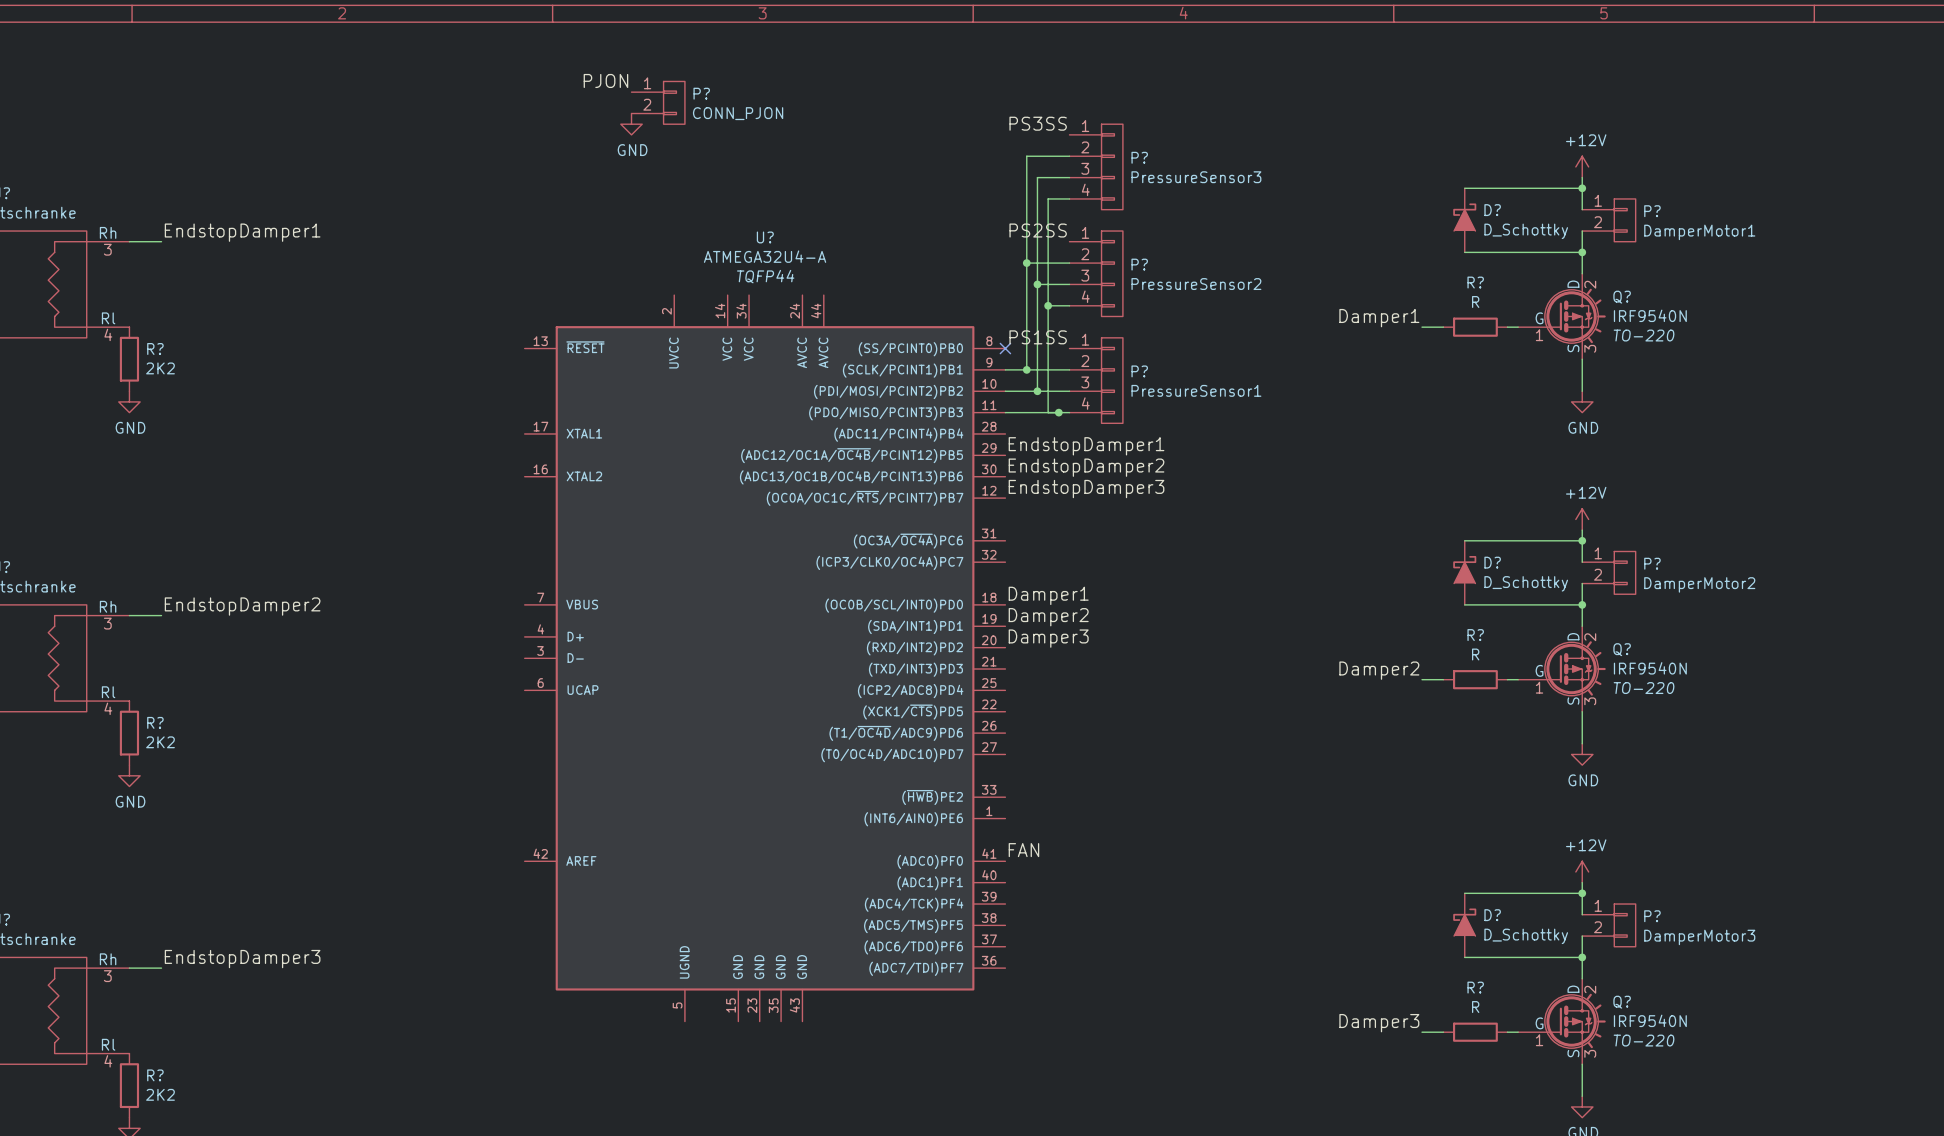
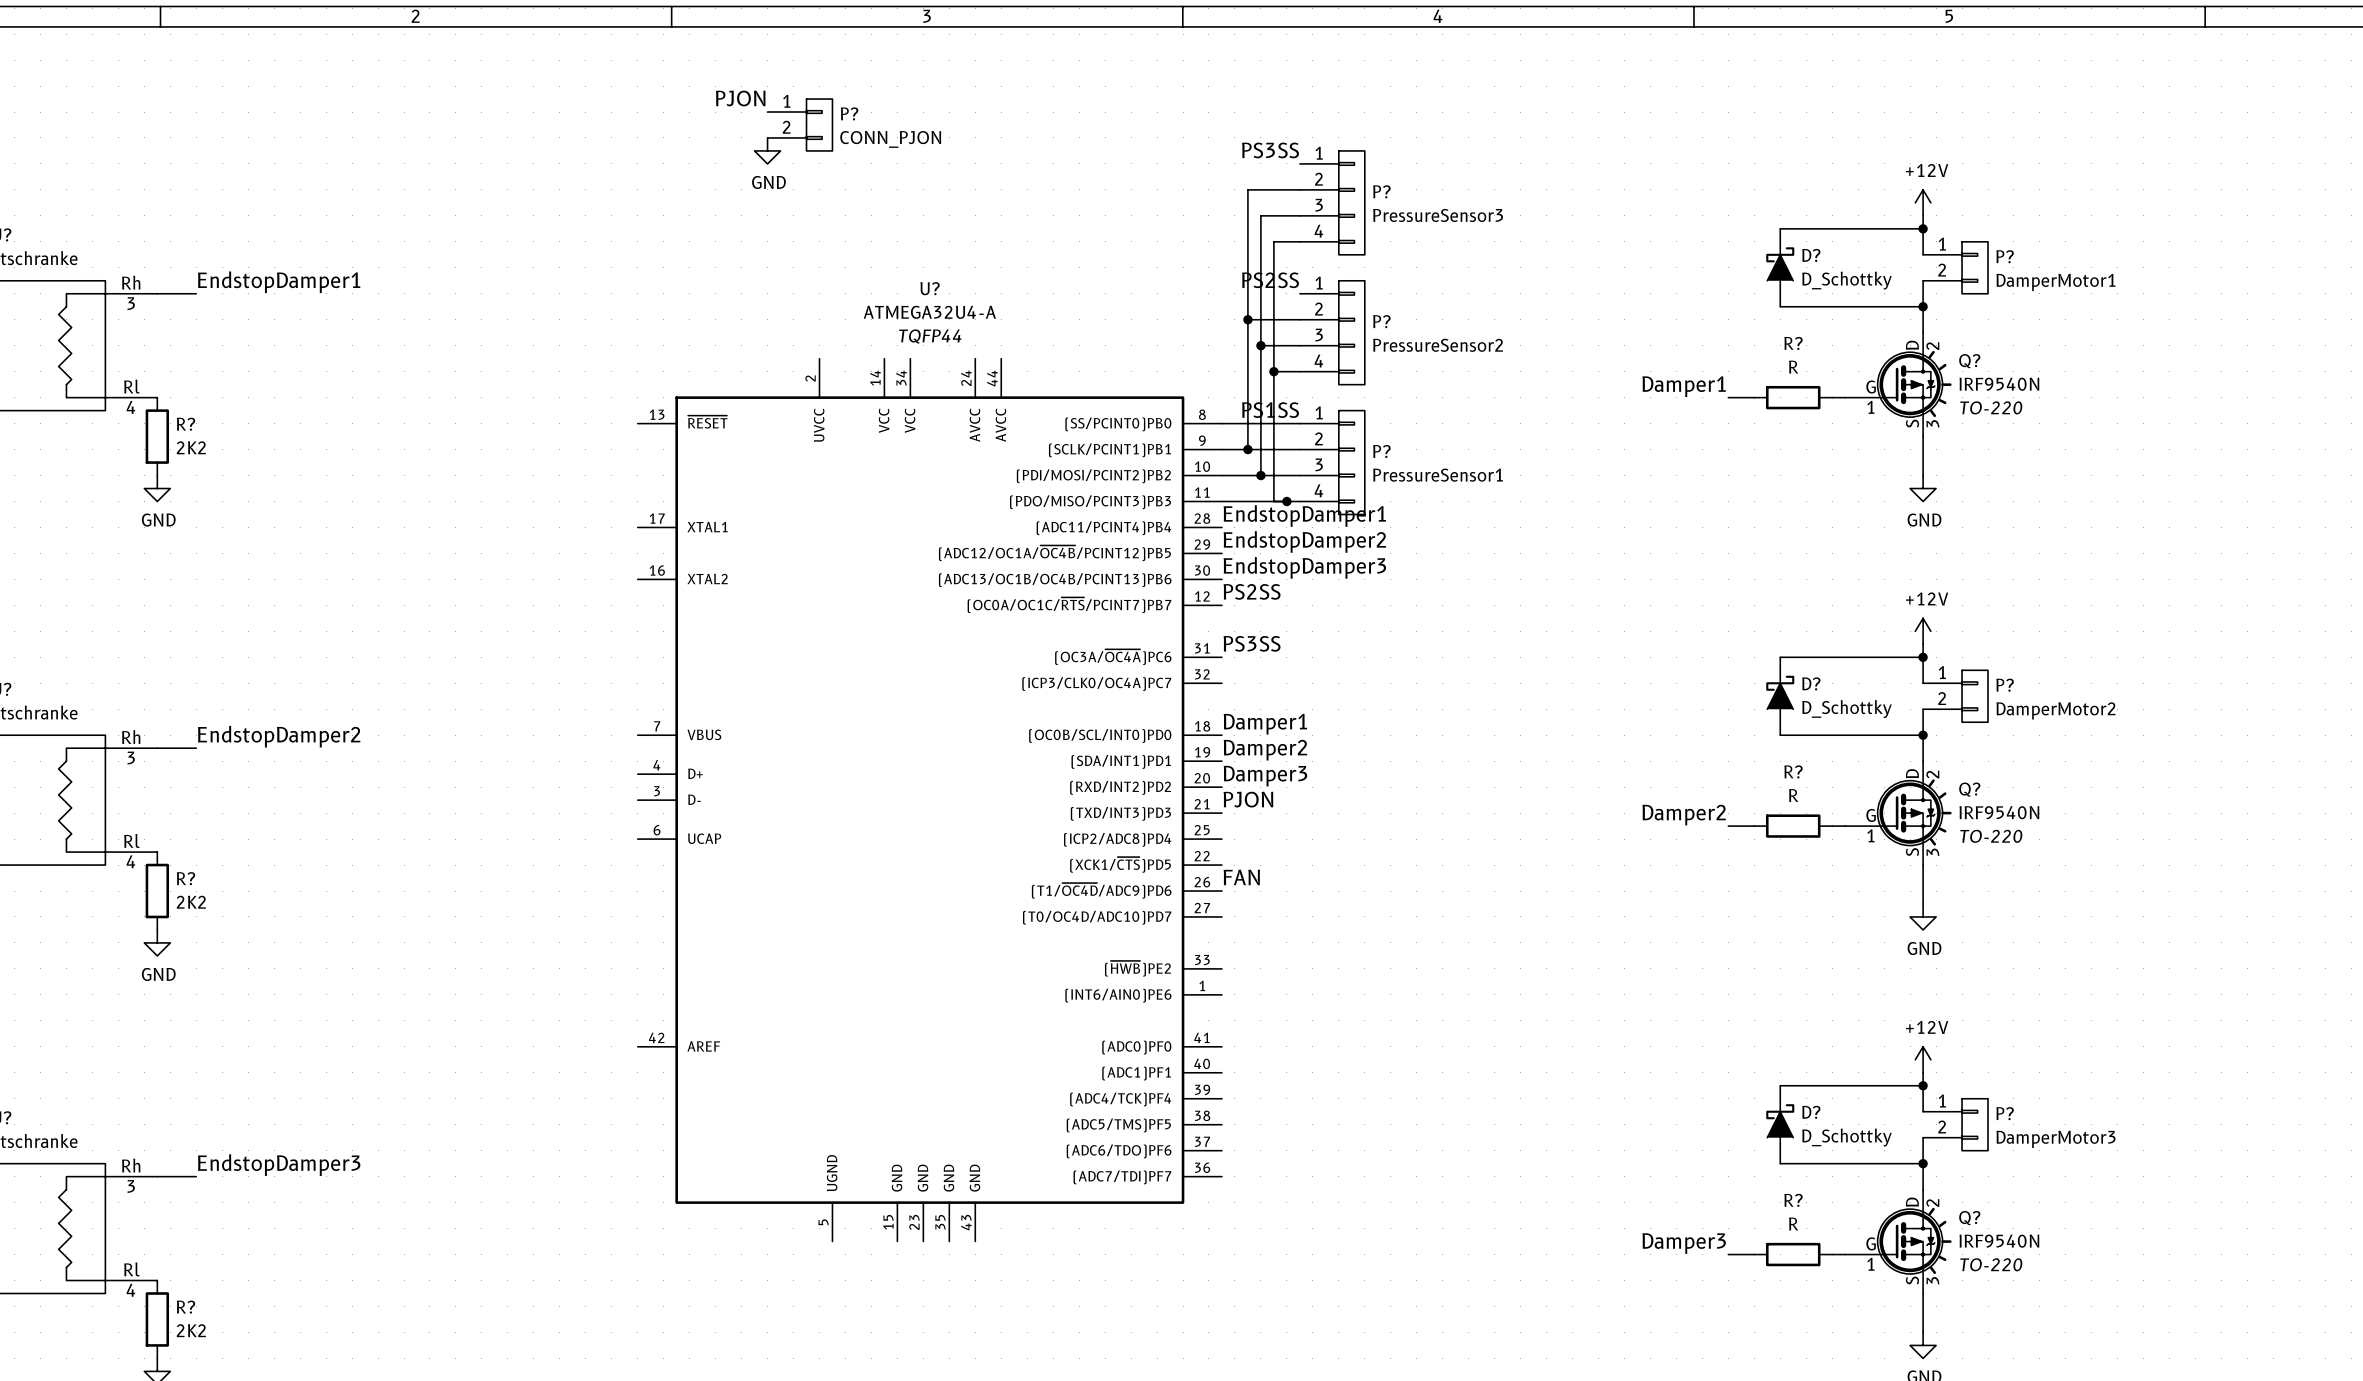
wire: none -> (1221, 423) (1299, 423)
no-connect mark: (1005, 348) -> none
label: none -> EndstopDamper1 (1304, 515)
label: EndstopDamper1 (1086, 446) -> EndstopDamper2 (1304, 541)
label: EndstopDamper2 (1086, 467) -> EndstopDamper3 (1304, 567)
label: EndstopDamper3 (1086, 489) -> PS2SS (1252, 591)
label: none -> PS3SS (1252, 643)
label: none -> PJON (1248, 799)
label position: FAN (1023, 850) -> FAN (1241, 877)

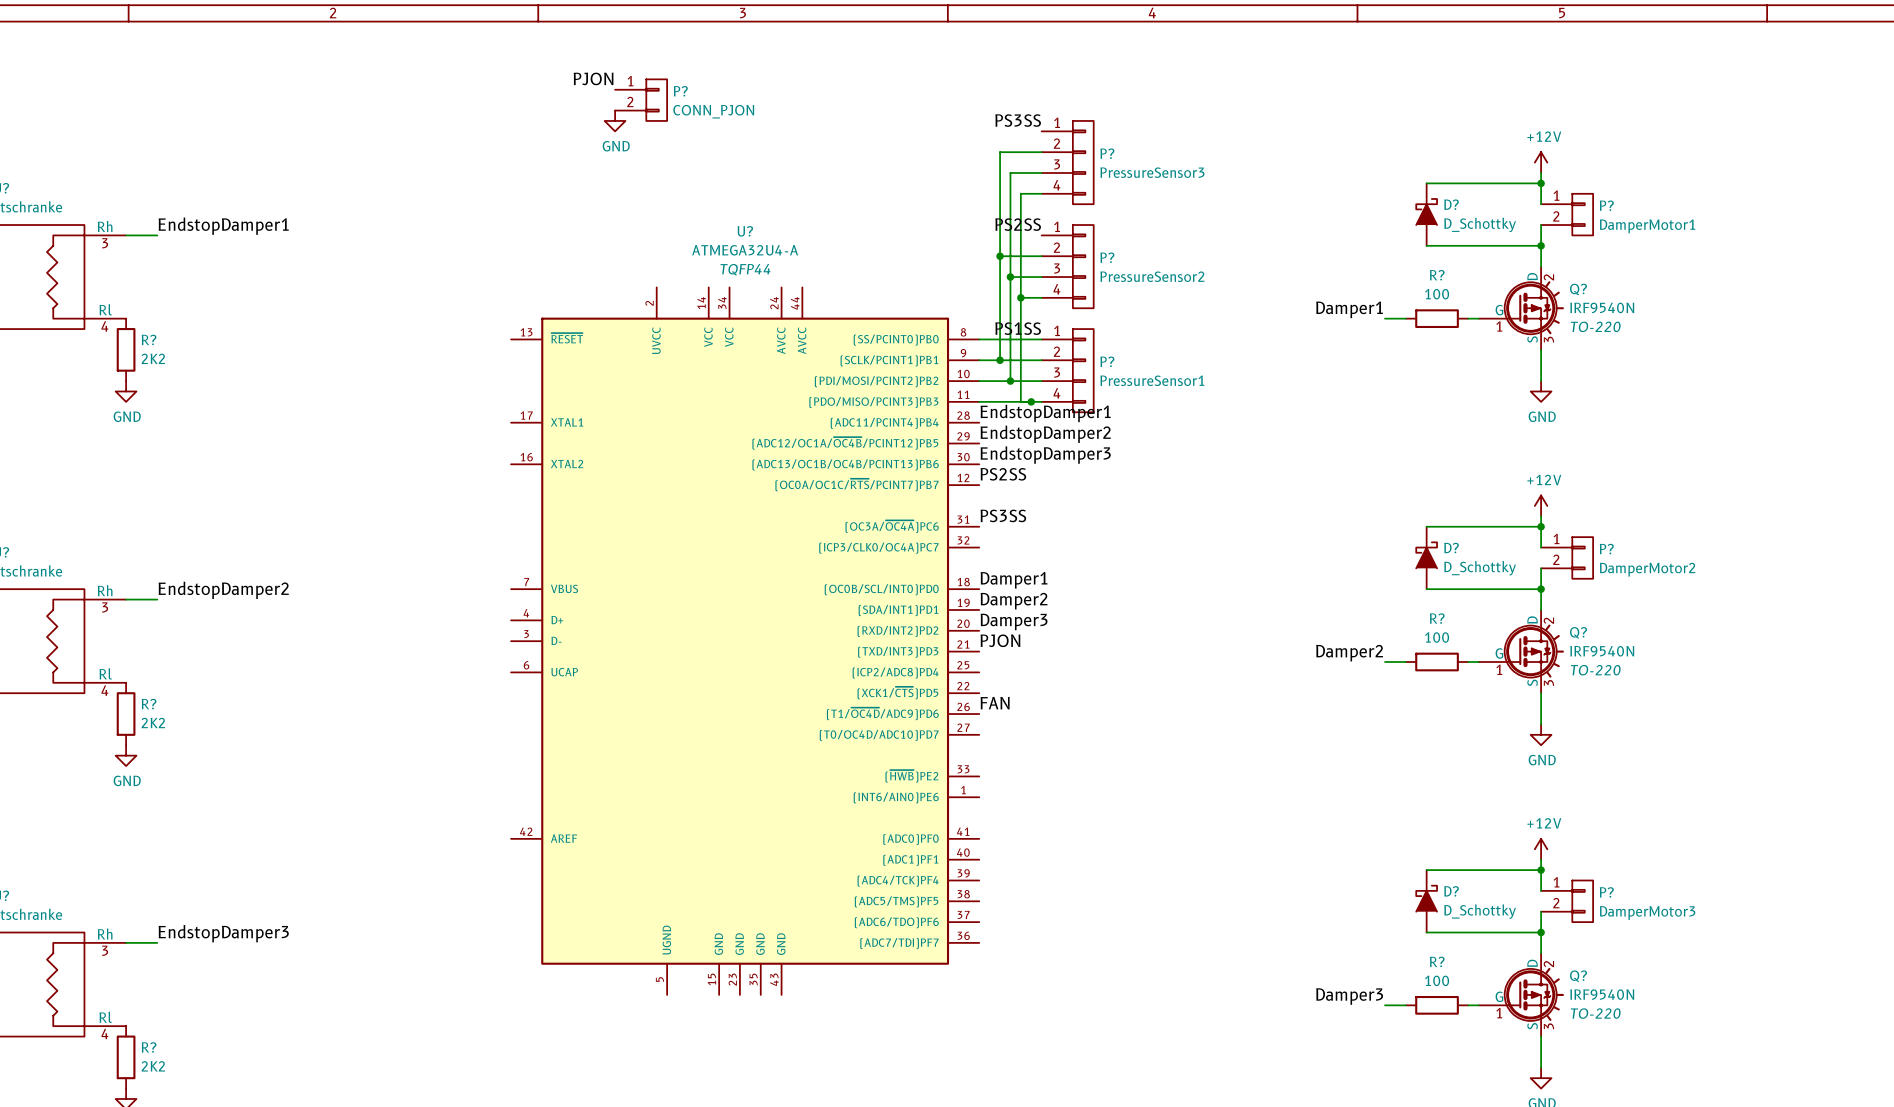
R? value: R (1793, 367) -> 100 (1437, 294)
R? value: R (1793, 795) -> 100 (1437, 637)
R? value: R (1793, 1223) -> 100 (1437, 980)

